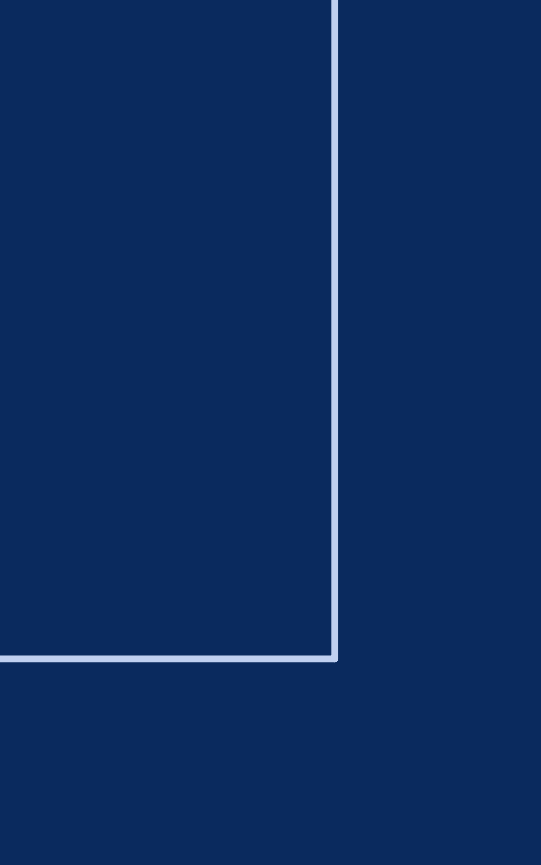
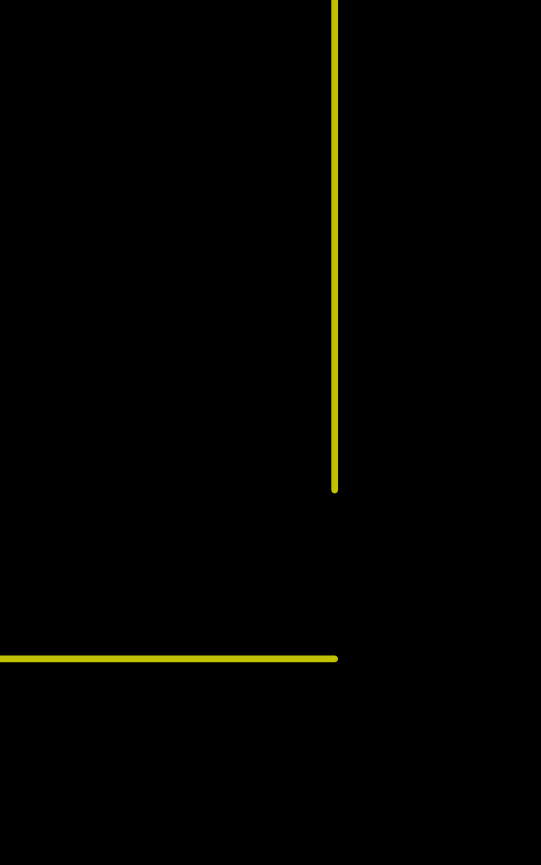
board edge: (334, 490) (334, 658) -> none

